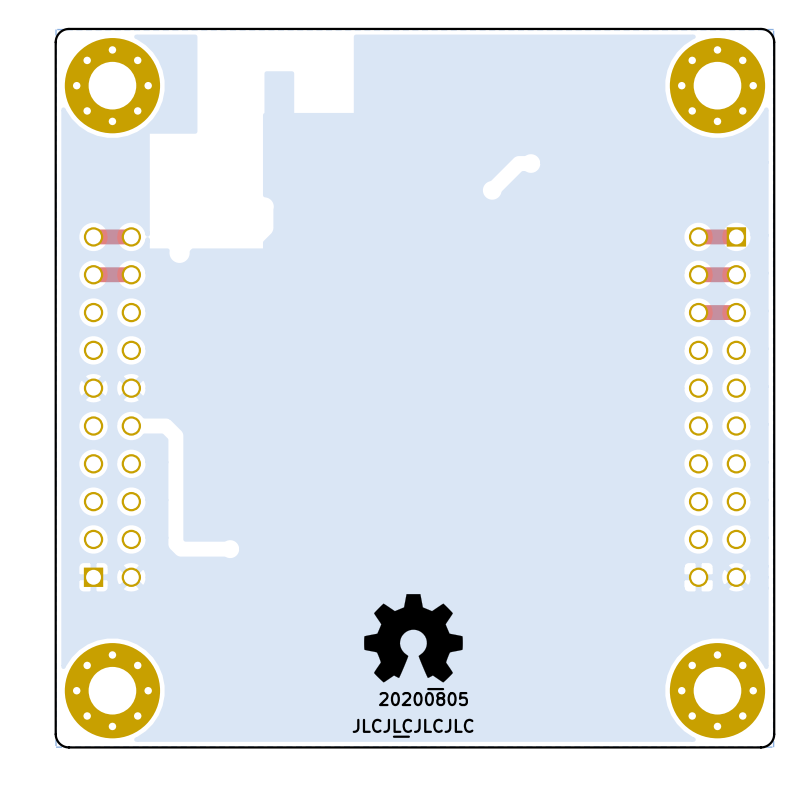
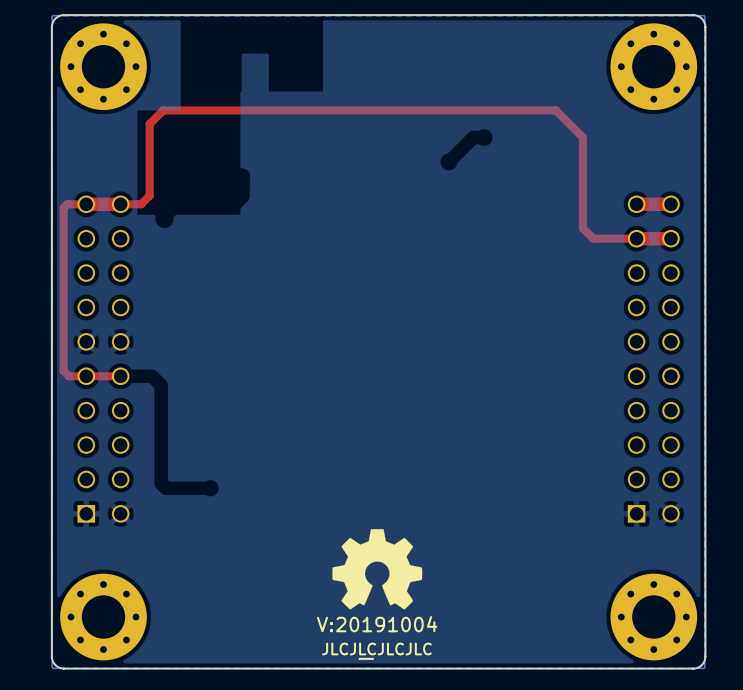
top track: none -> (86, 204) (67, 204) (63, 207) (63, 371) (68, 376) (120, 376)
top track: none -> (120, 204) (141, 204) (149, 195) (149, 123) (163, 110) (555, 110) (582, 137) (582, 228) (593, 238) (636, 238)
top track: (131, 274) (93, 274) -> none
top track: (736, 312) (698, 312) -> none
part rotation: 0° (717, 407) -> 180° (653, 359)
drawing: [427, 687, 445, 691] -> none
drawing: none -> [316, 616, 438, 633]

